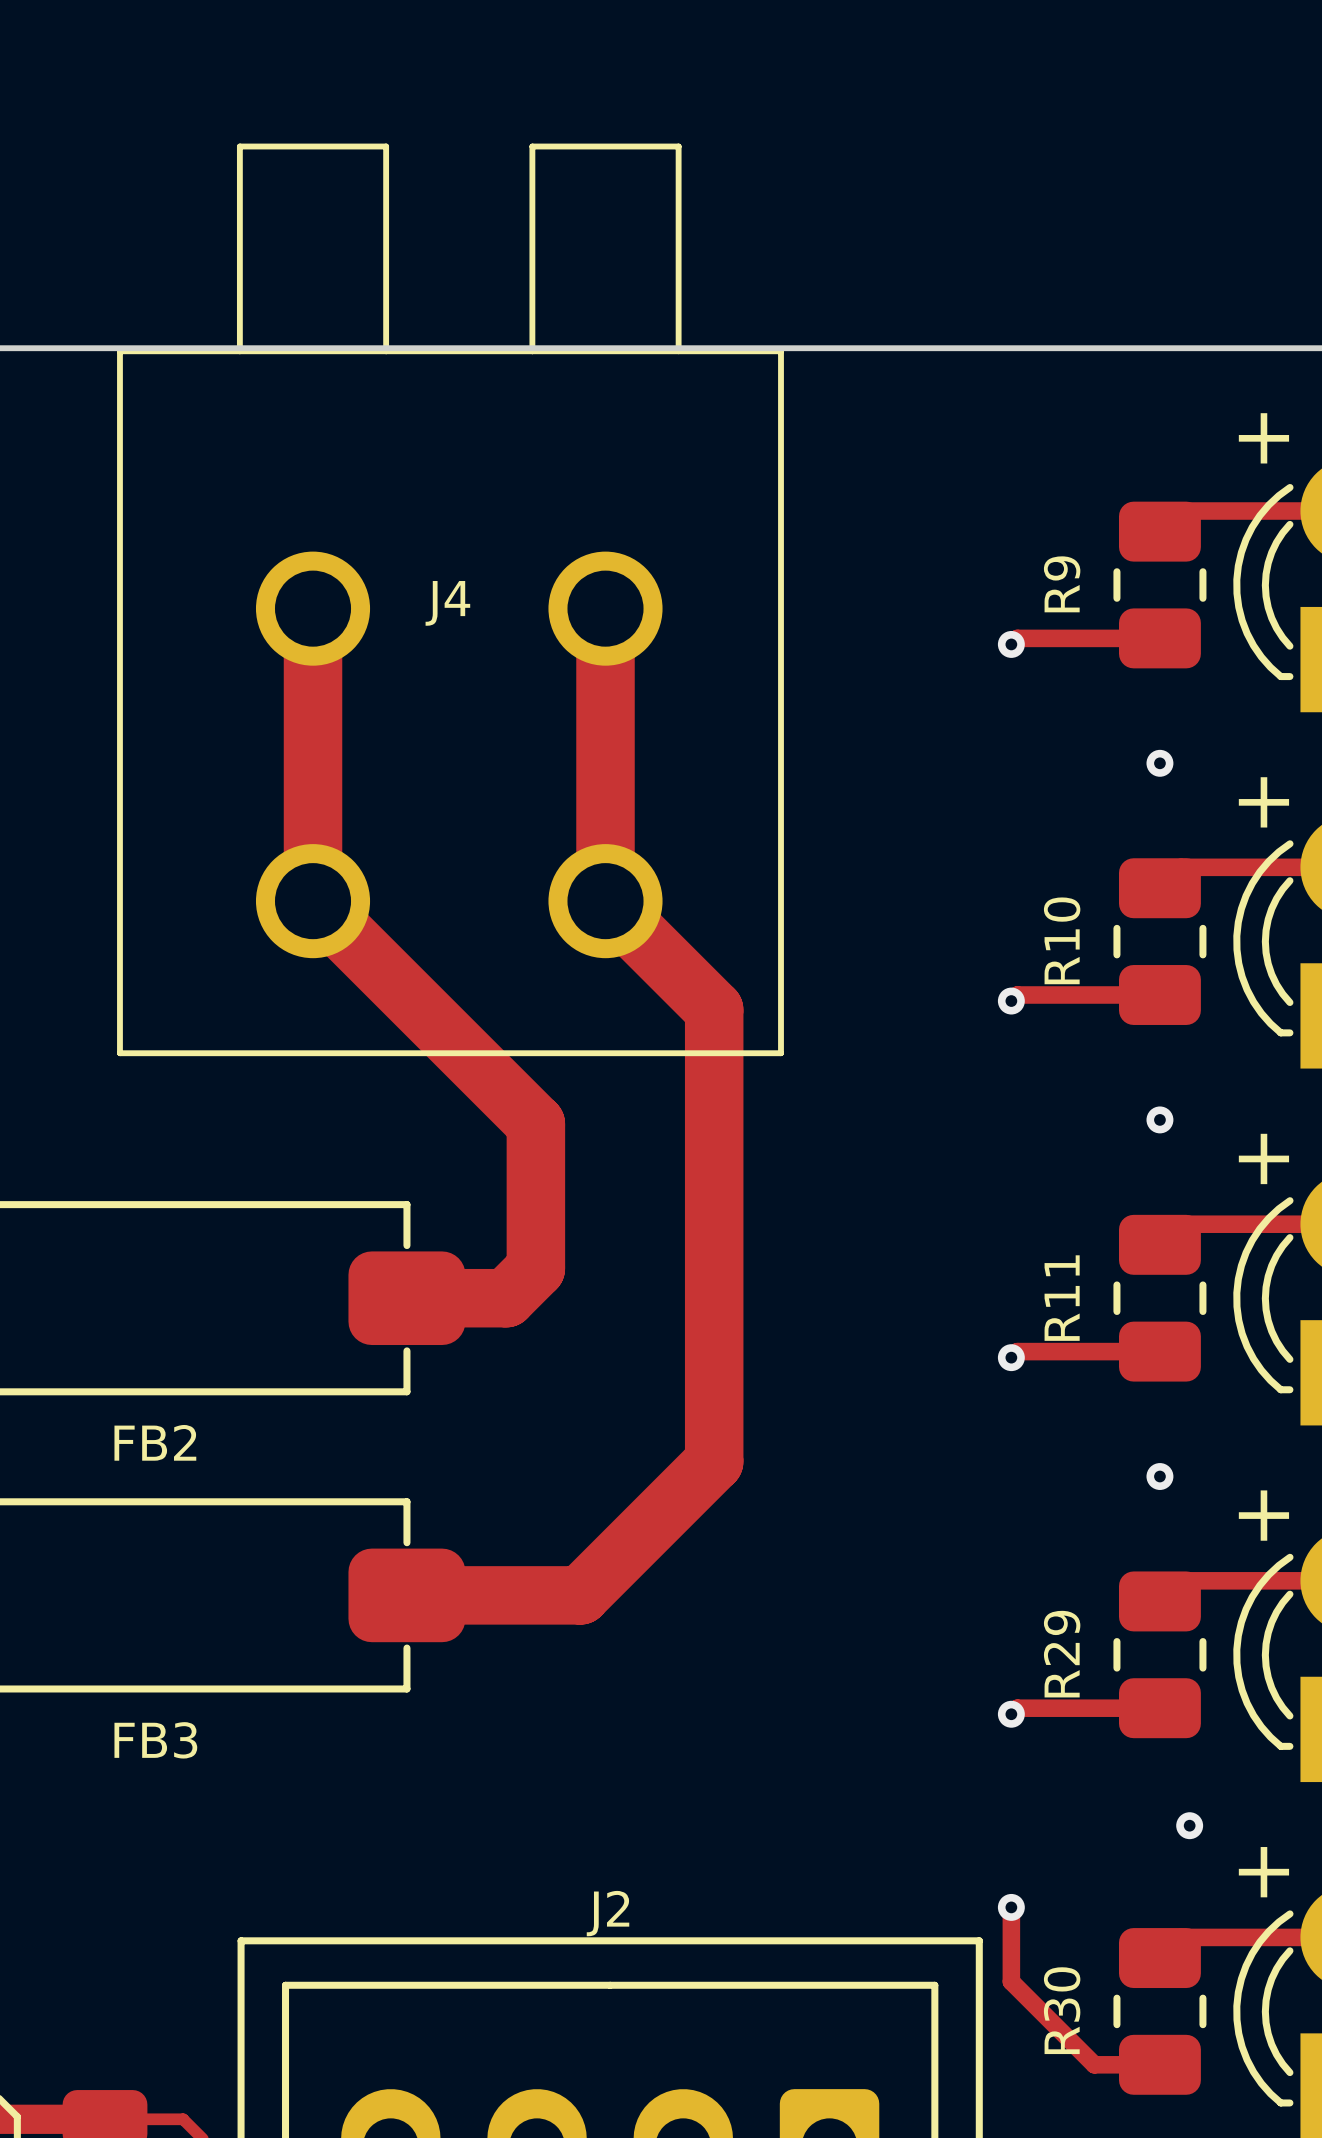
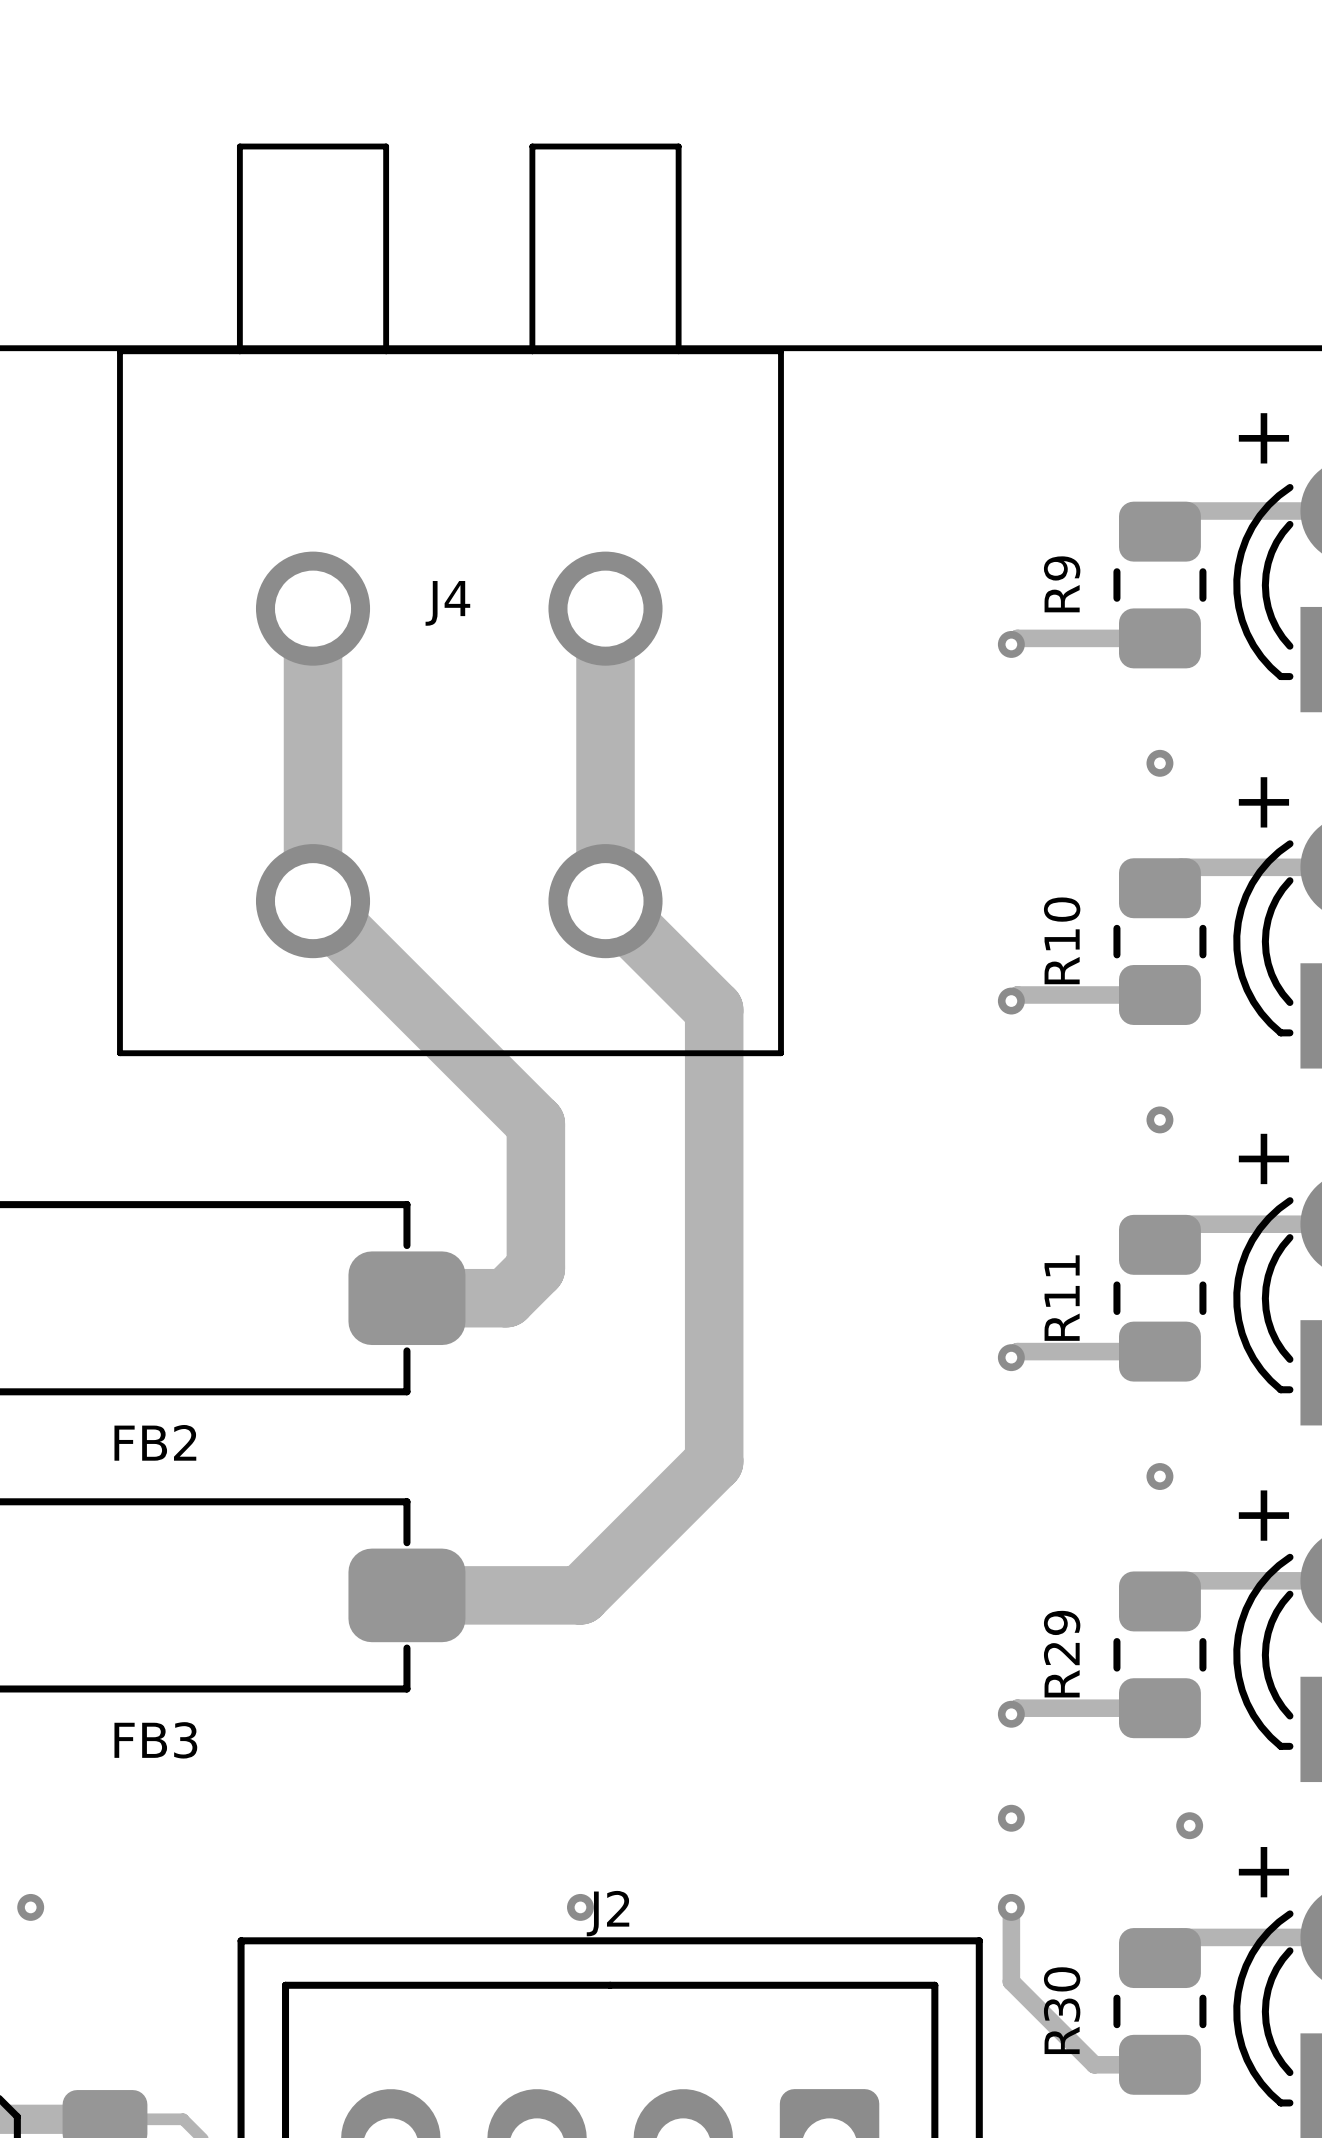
via: none -> (1011, 1818)
via: none -> (30, 1907)
via: none -> (580, 1907)

